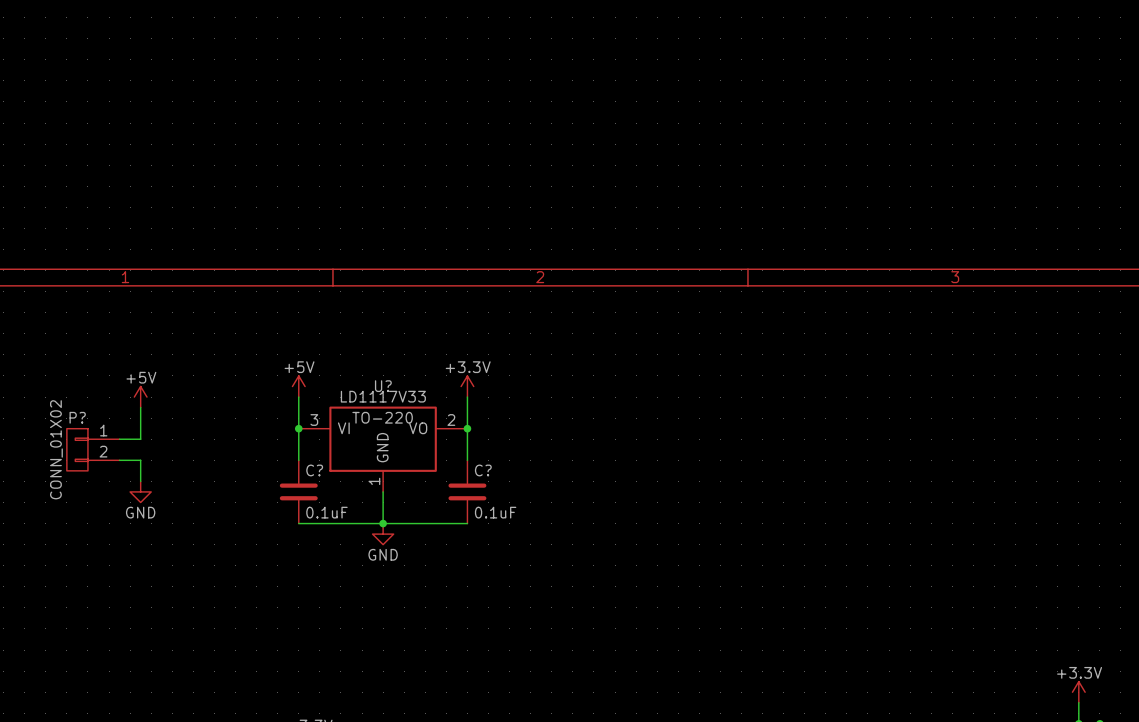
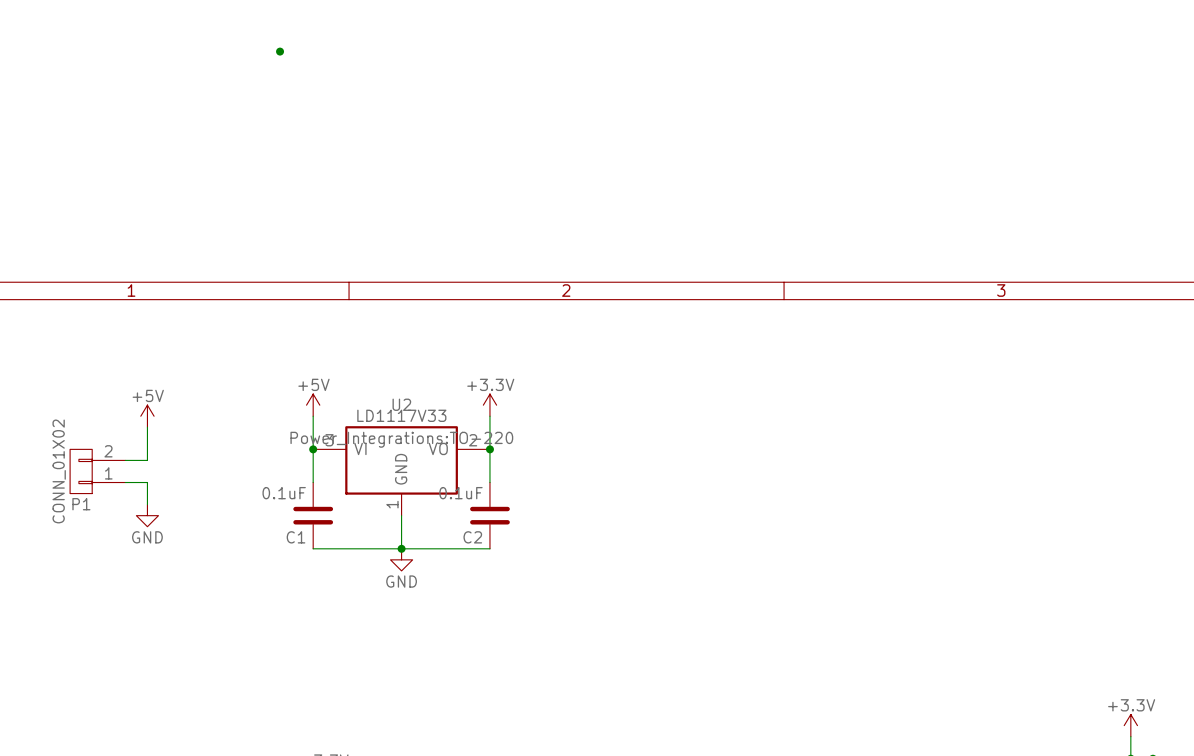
junction: none -> (280, 51)
U? name: U? (383, 386) -> U2 (401, 404)
P? name: P? (77, 417) -> P1 (81, 504)
U? text: TO-220 (382, 417) -> Power_Integrations:TO-220 (401, 439)
P? flip: as is (77, 449) -> up-down (81, 471)
C? name: C? (314, 470) -> C1 (296, 537)
C? name: C? (483, 470) -> C2 (472, 537)
C? value position: 0.1uF (326, 512) -> 0.1uF (284, 493)
C? value position: 0.1uF (495, 512) -> 0.1uF (460, 493)

